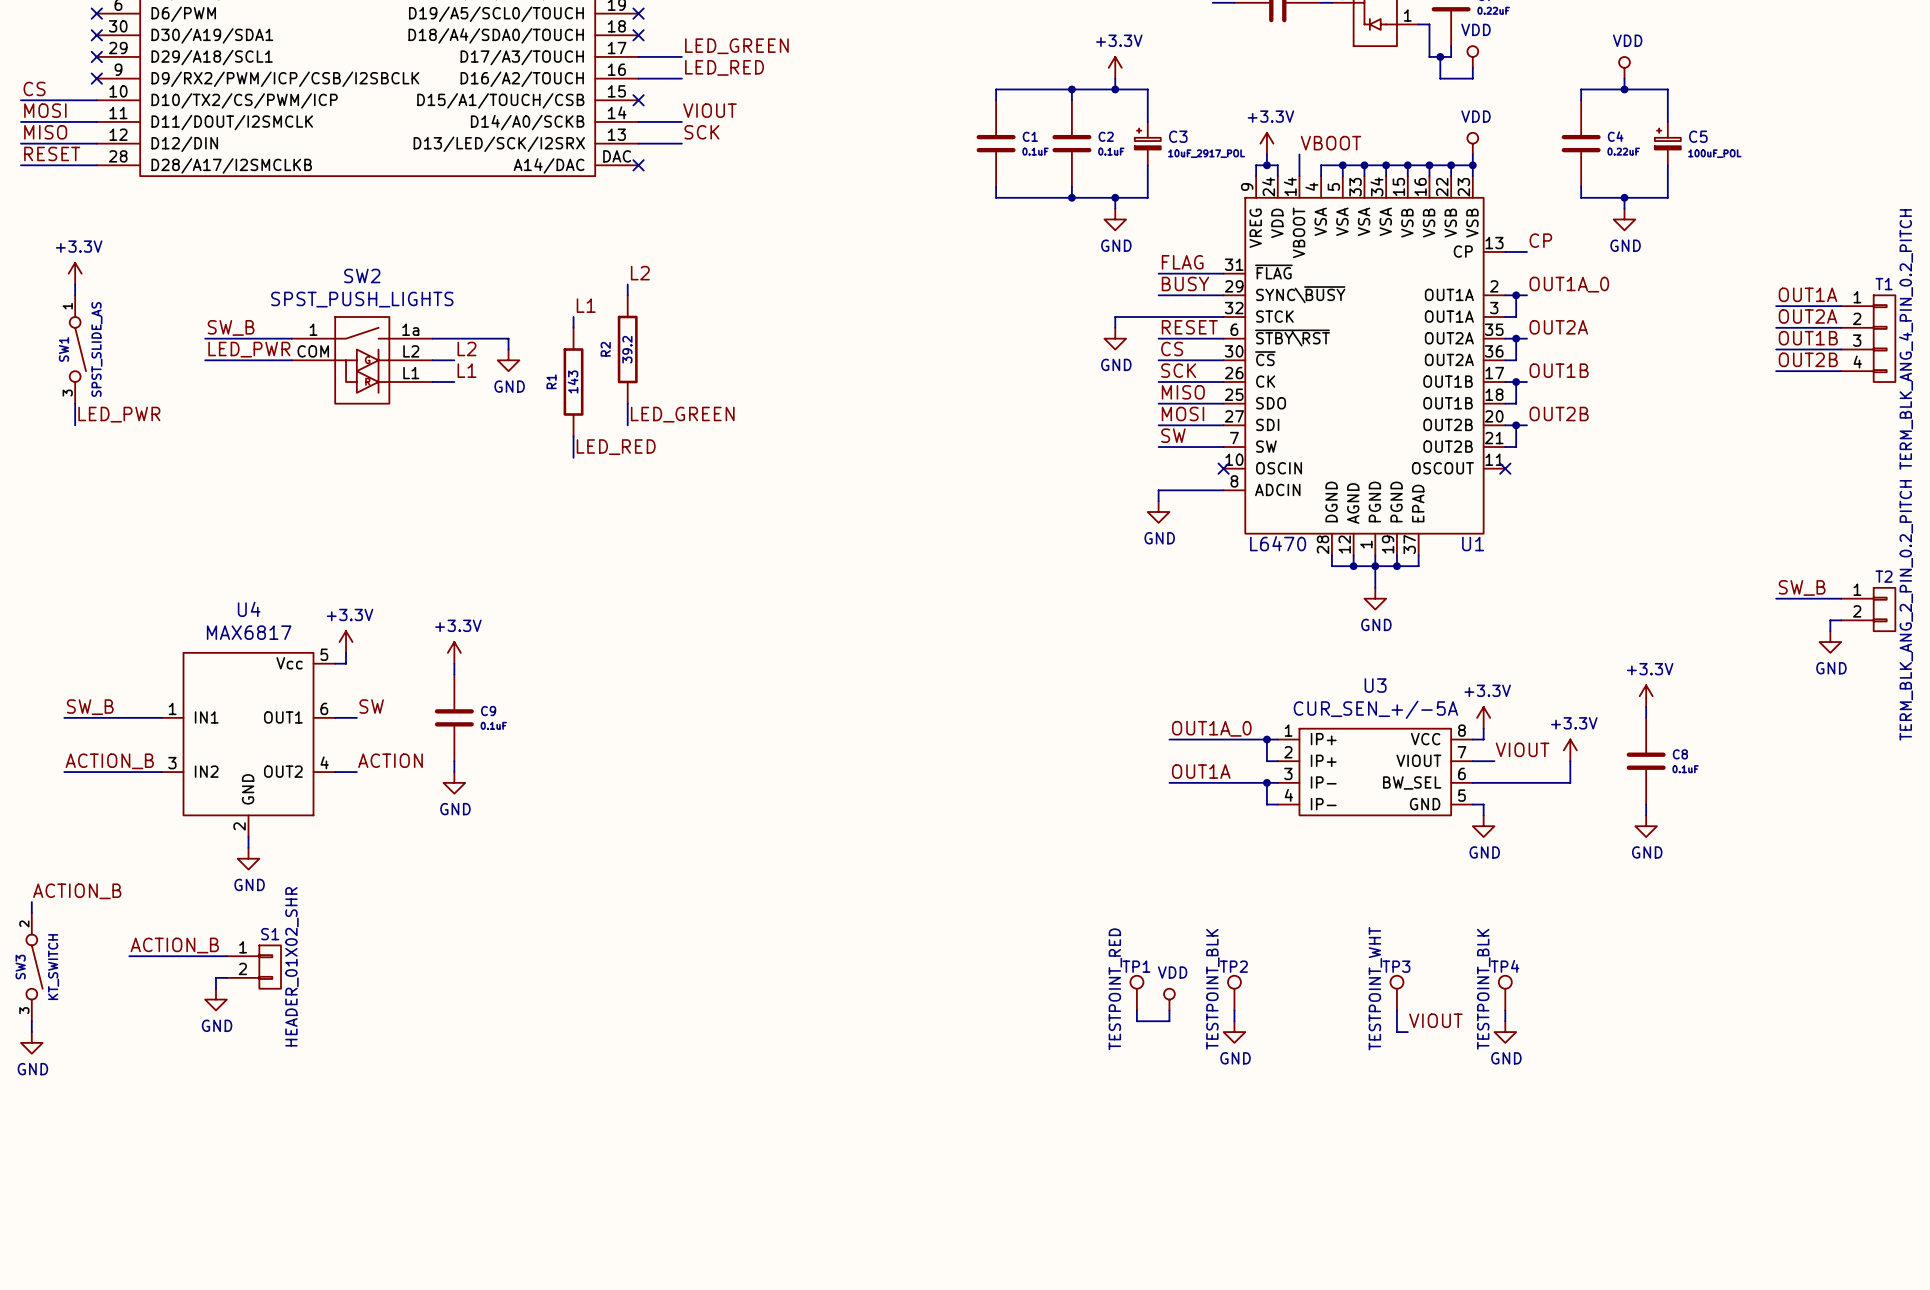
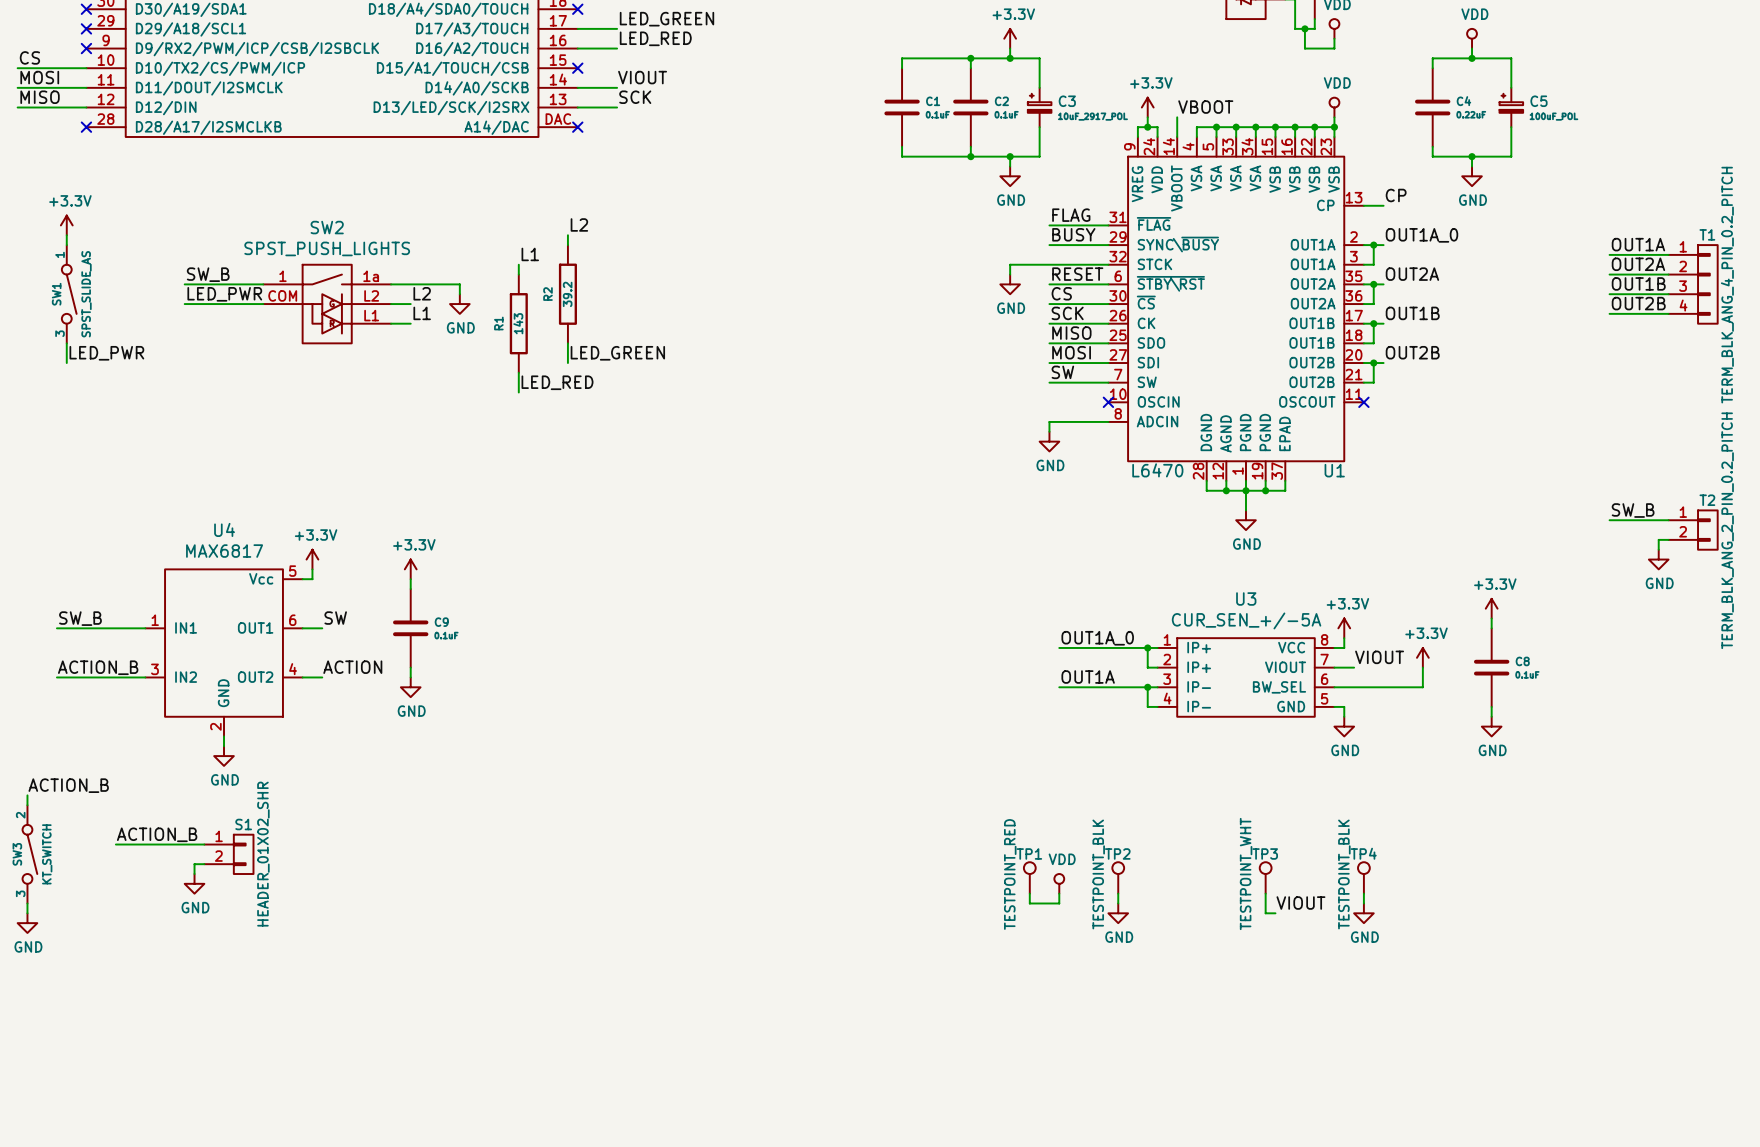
label: RESET (52, 153) -> none
wire: (20, 165) (96, 165) -> none
no-connect mark: none -> (86, 127)

